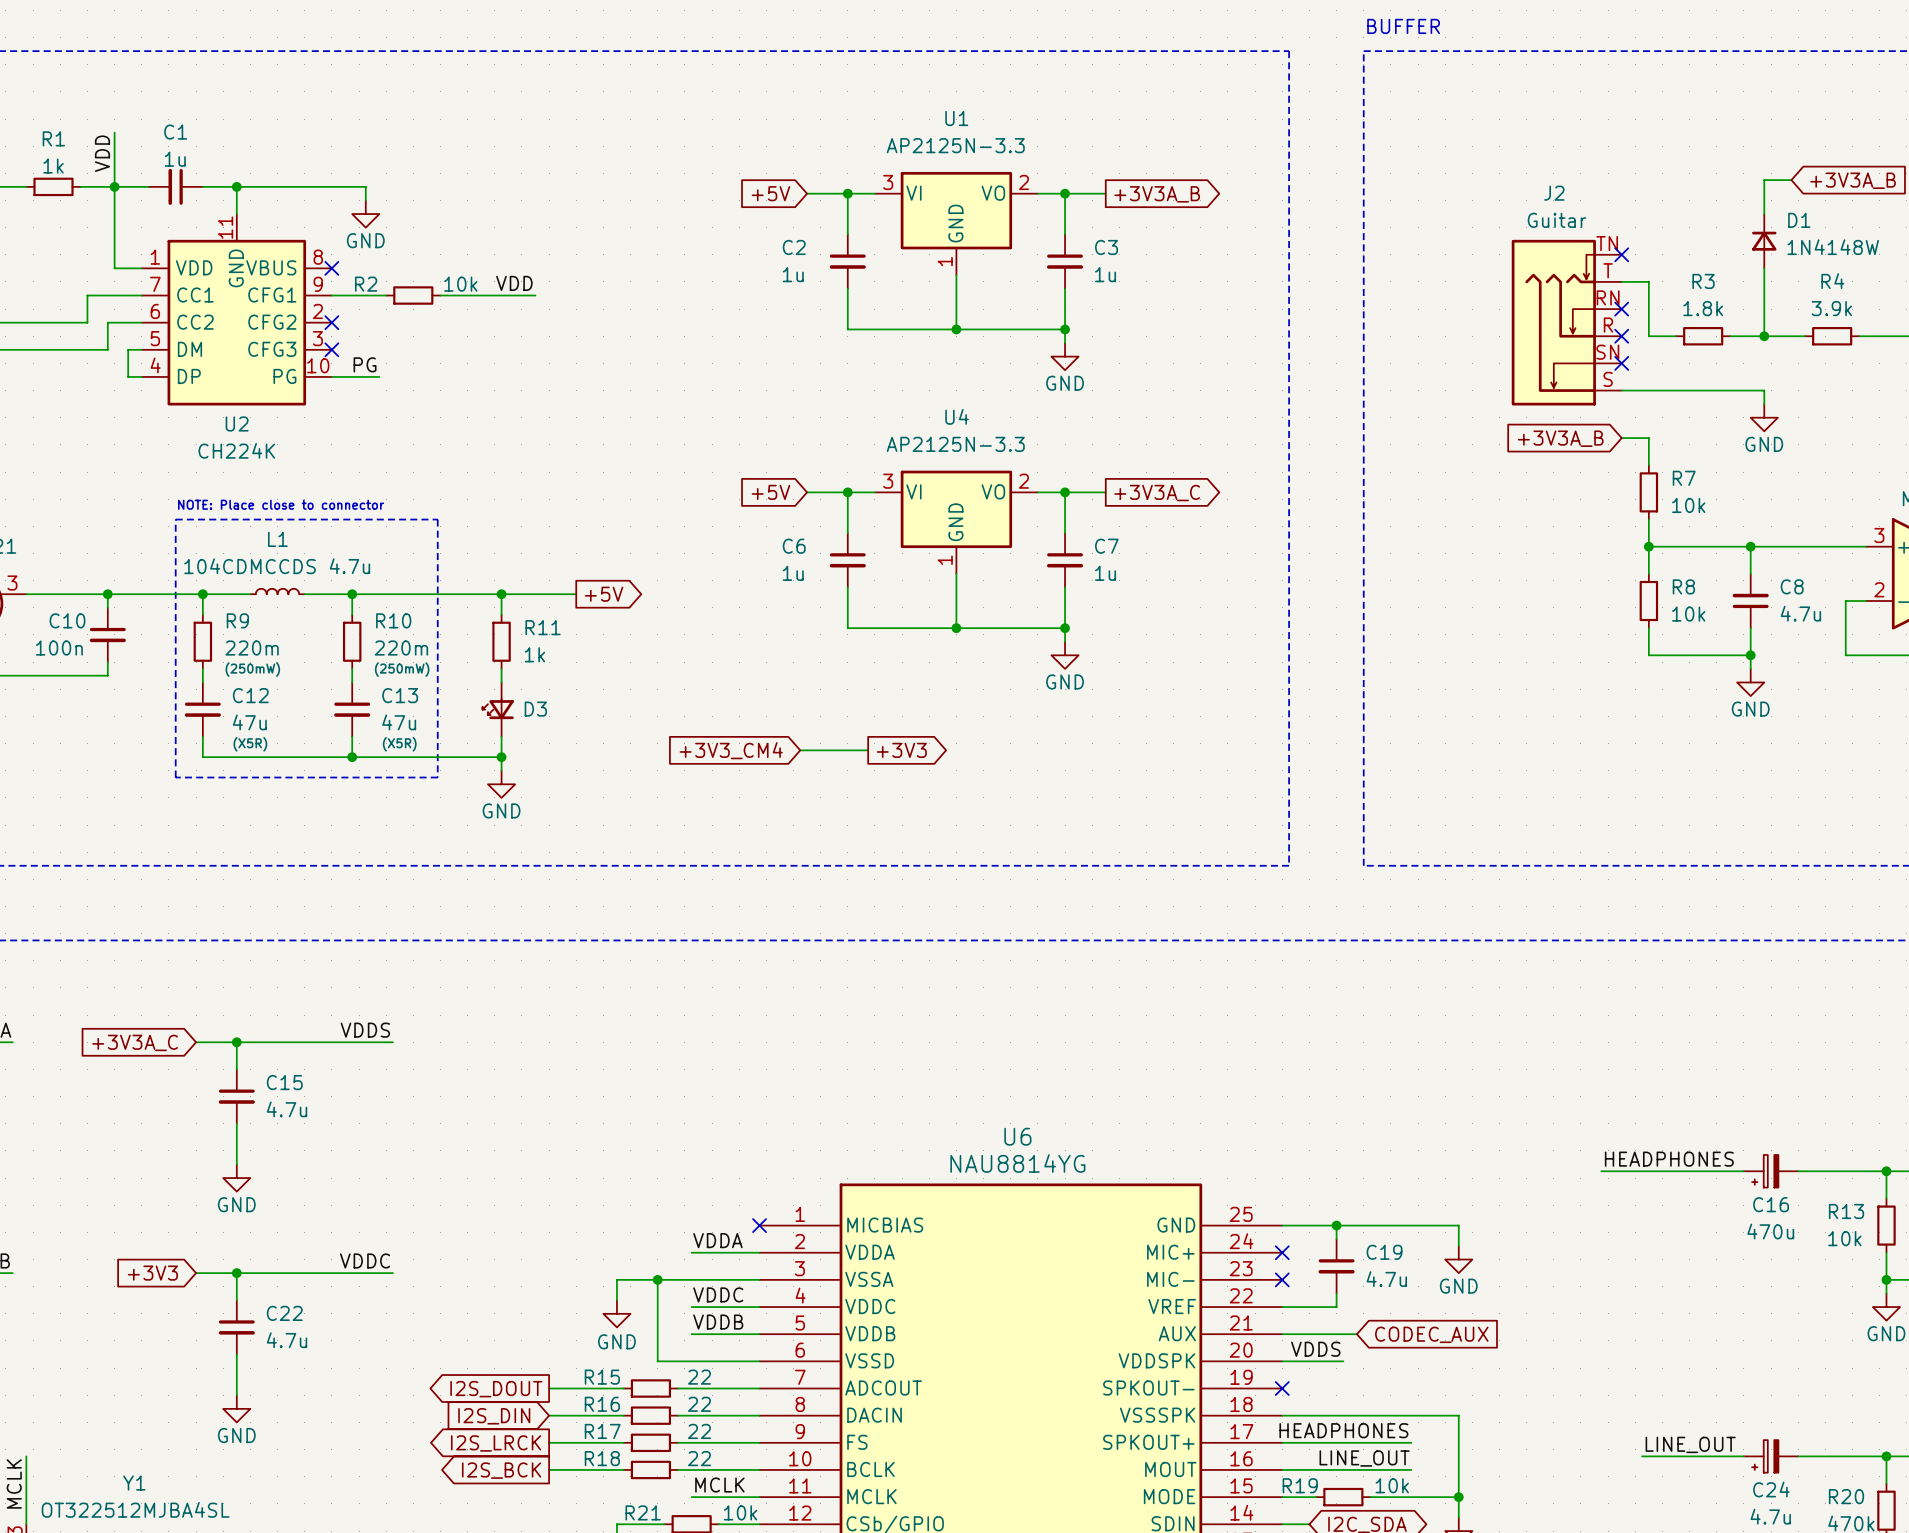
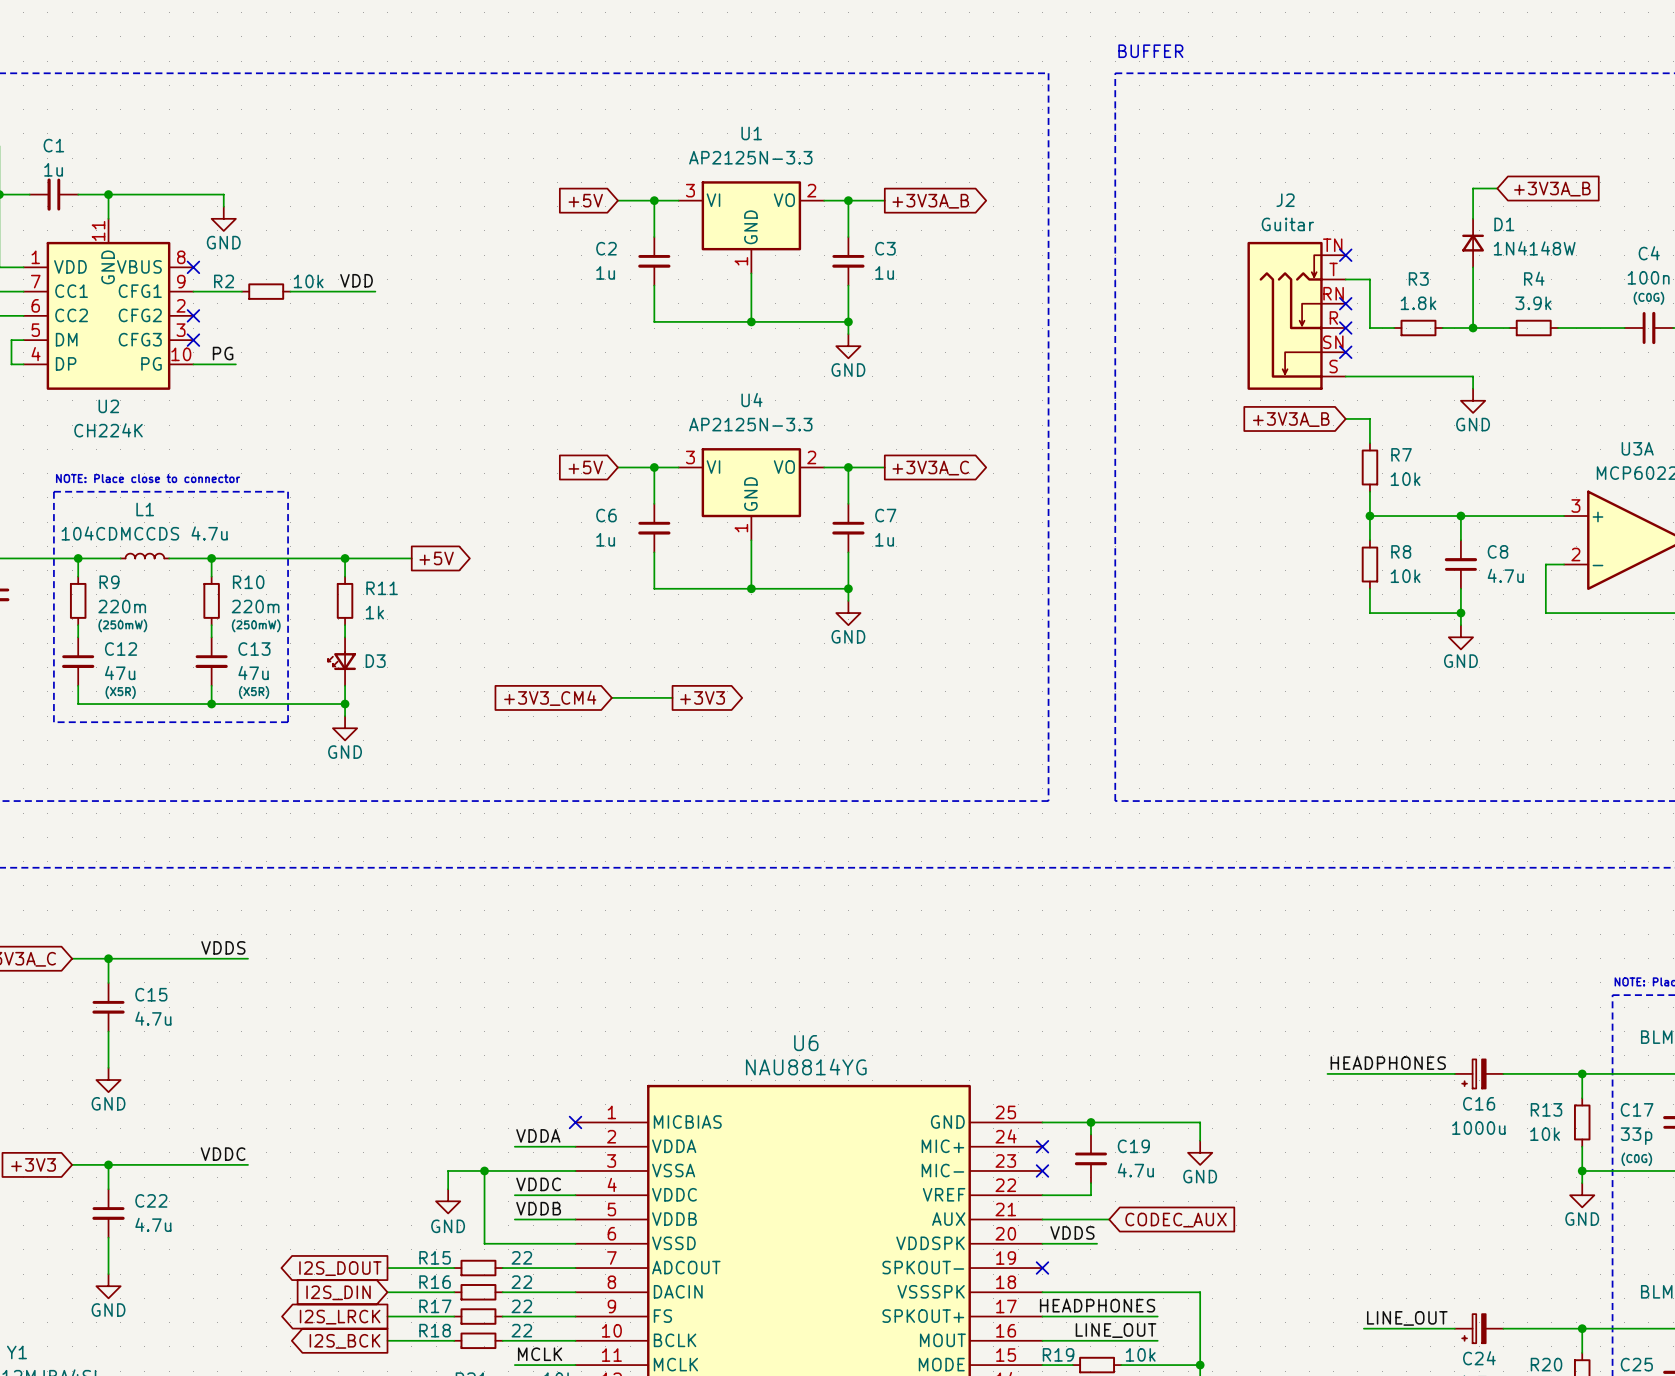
C16 value: 470u (1770, 1231) -> 1000u (1478, 1128)

